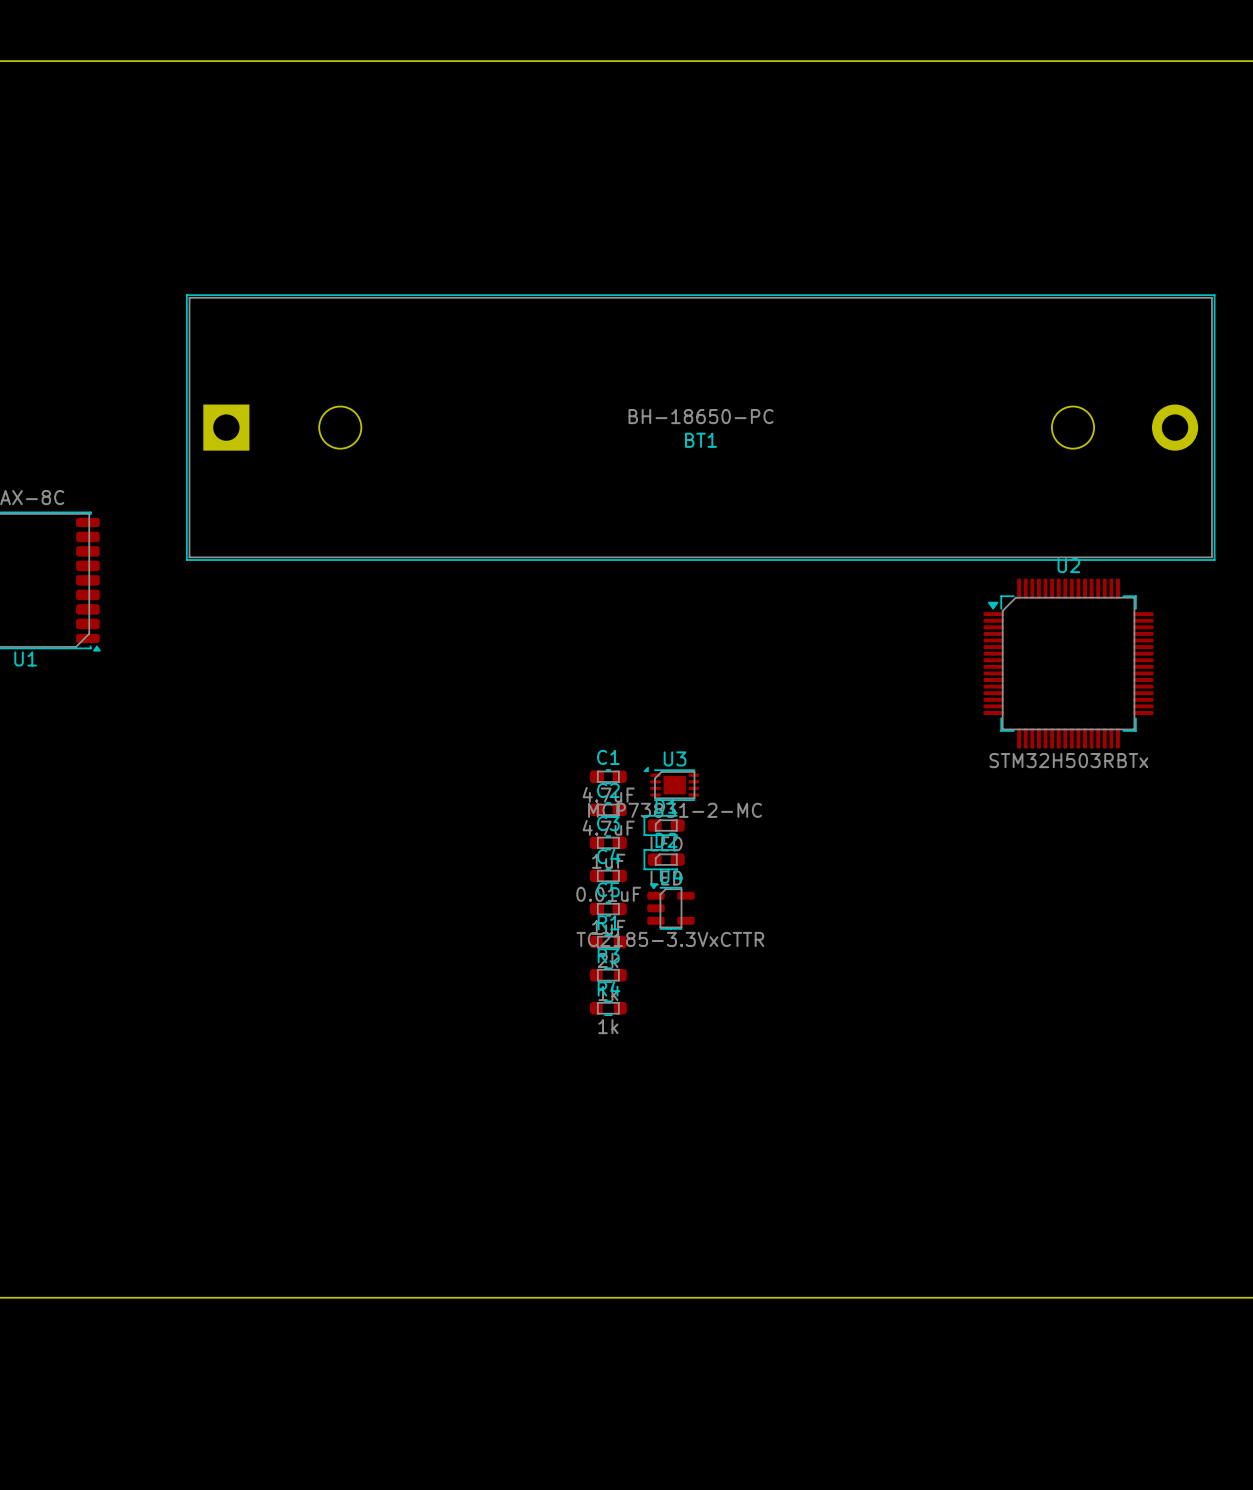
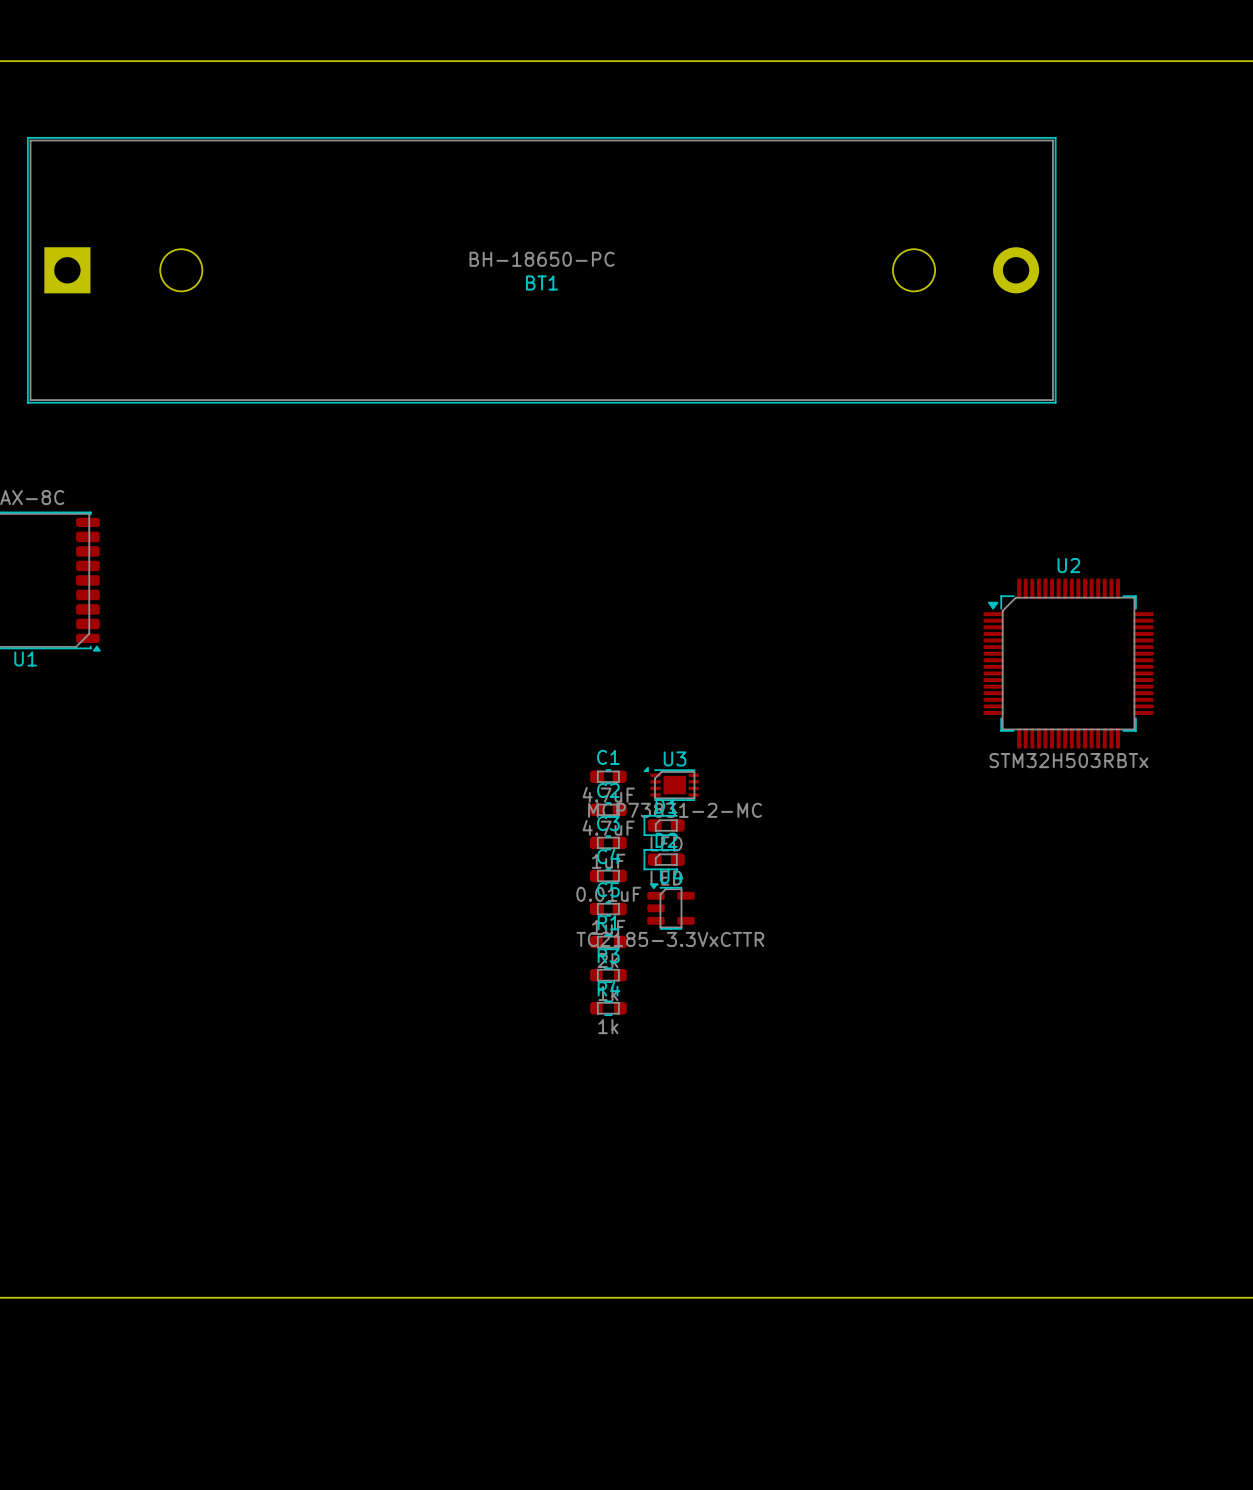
BT1 position: (700, 427) -> (541, 270)

